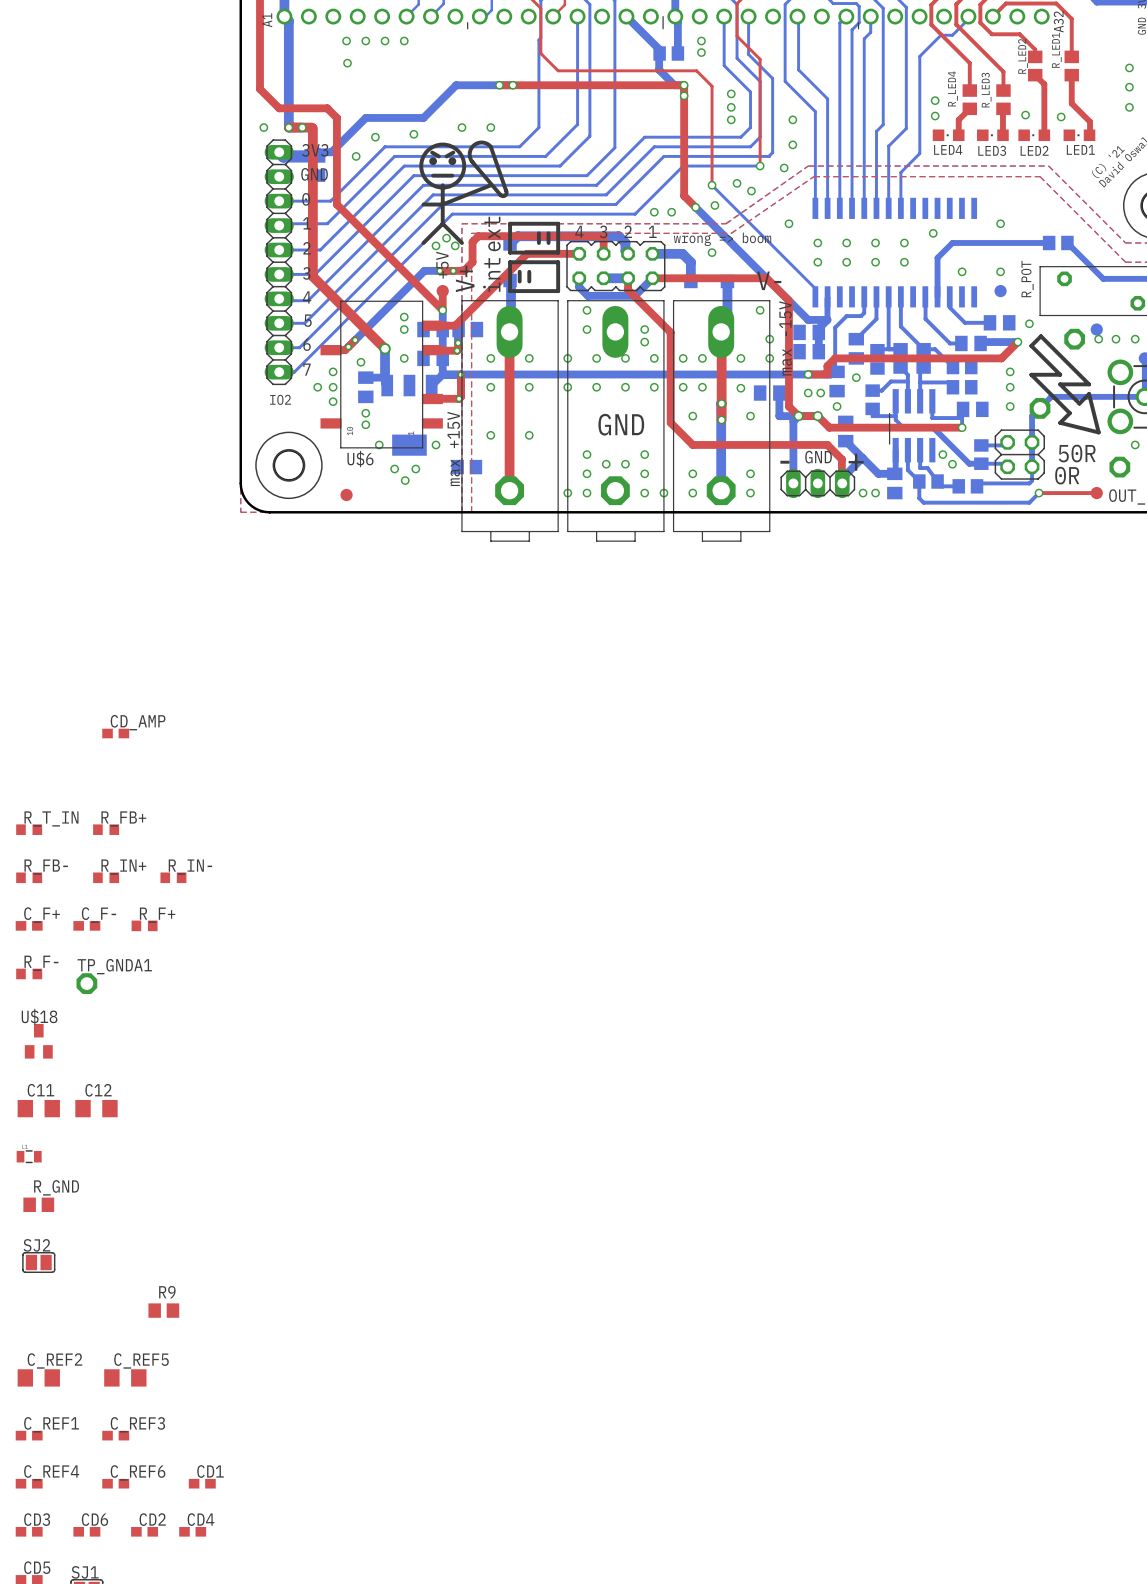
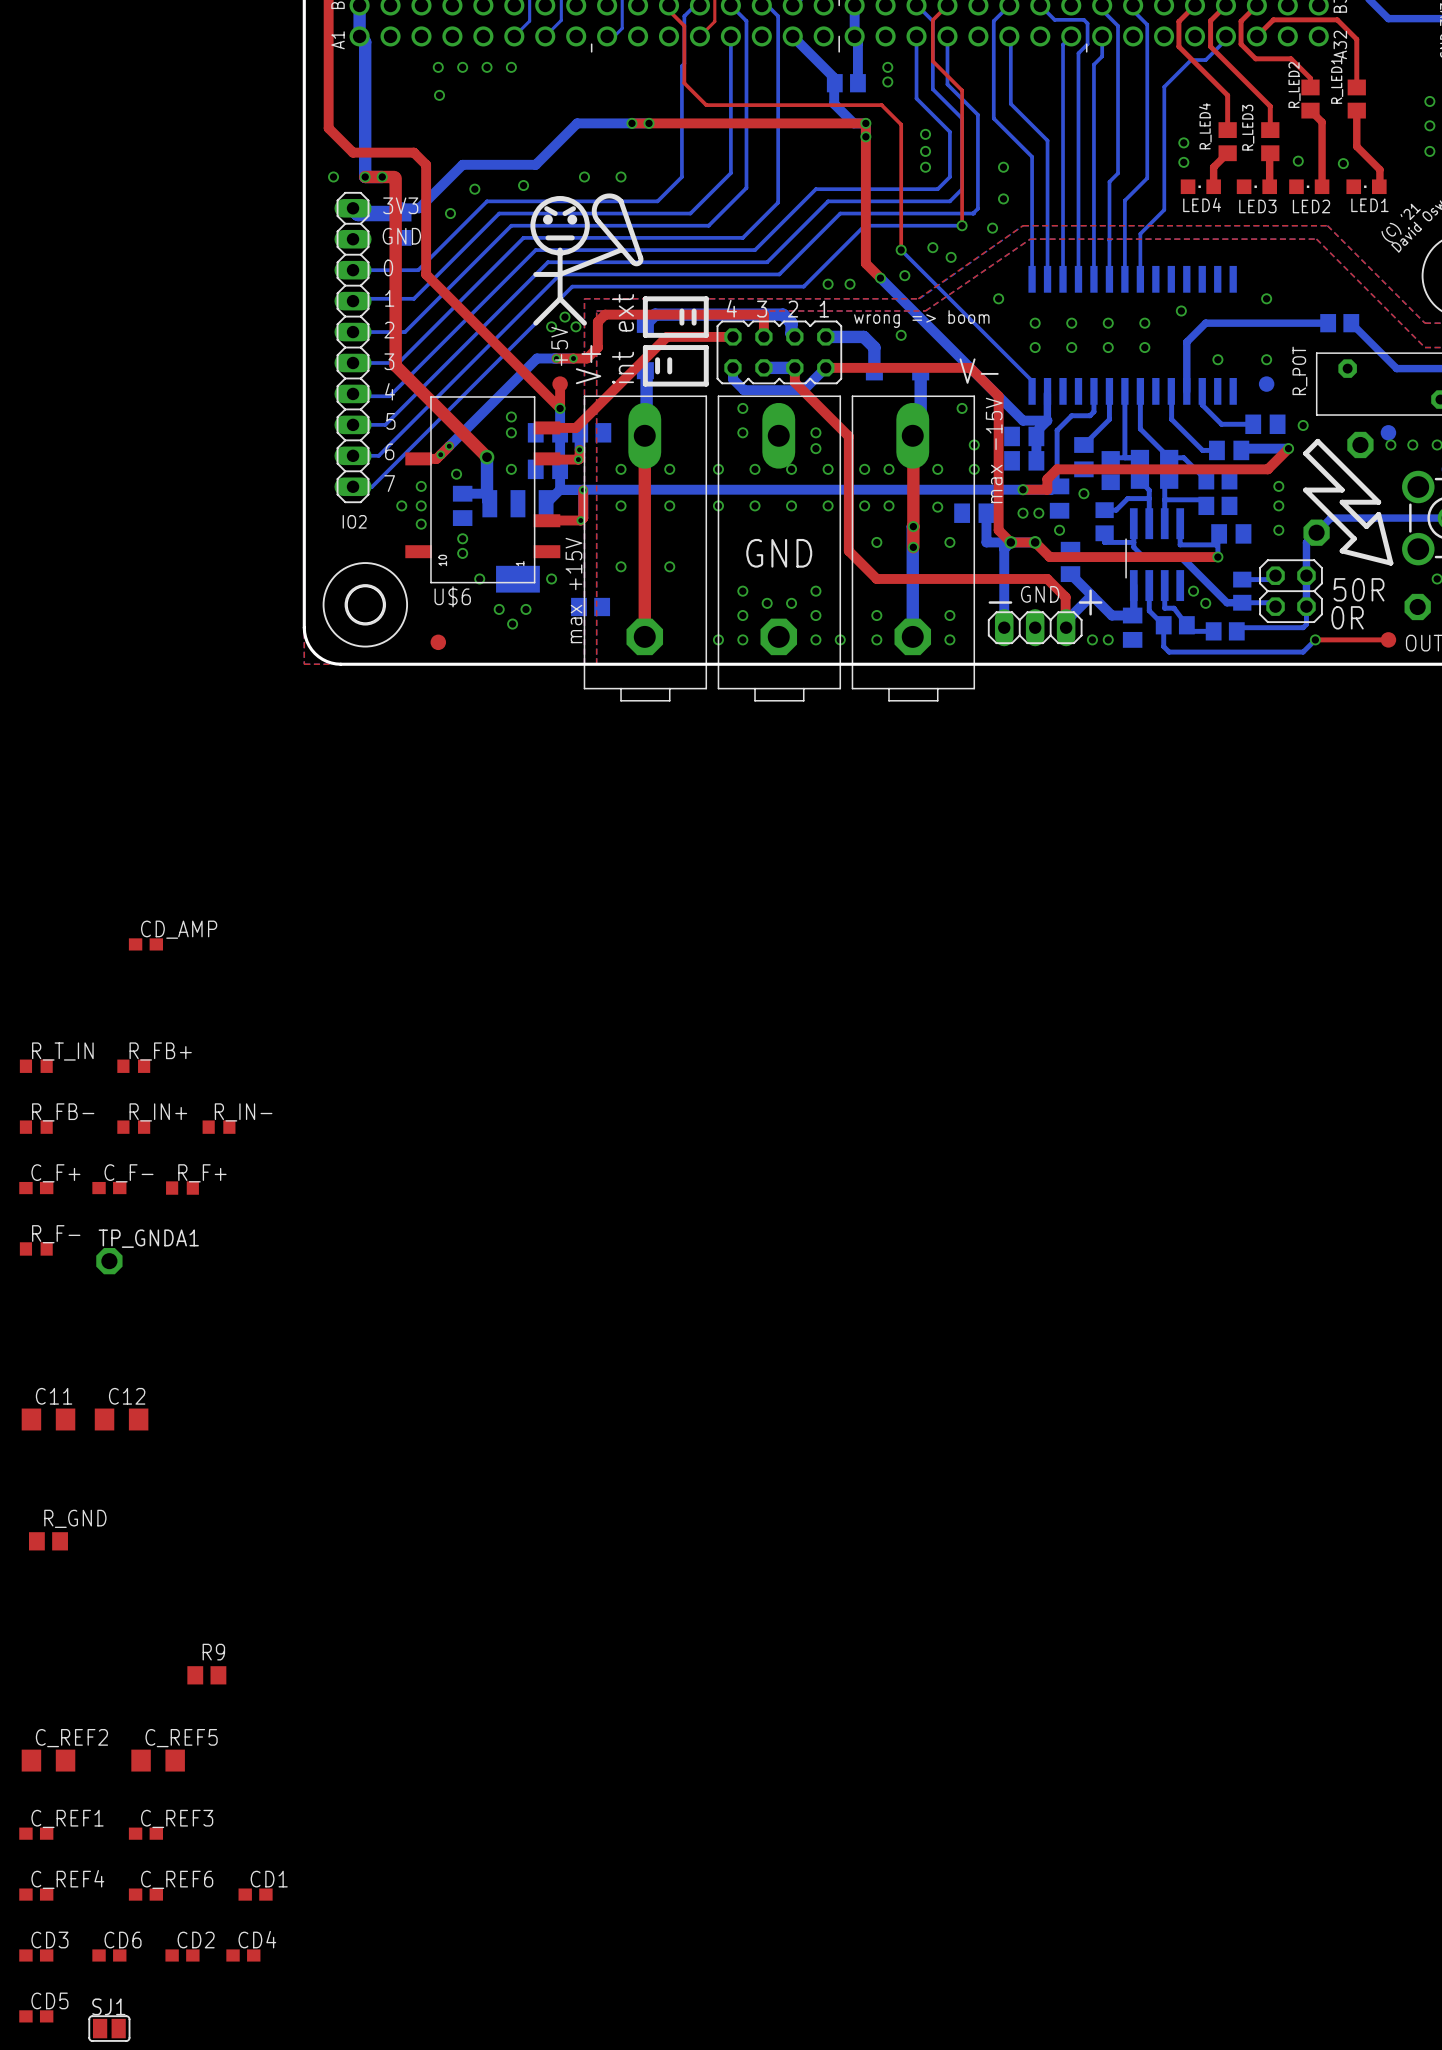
U$18: (38, 1041) -> none
part: (29, 1156) -> none
SJ2: (38, 1262) -> none

